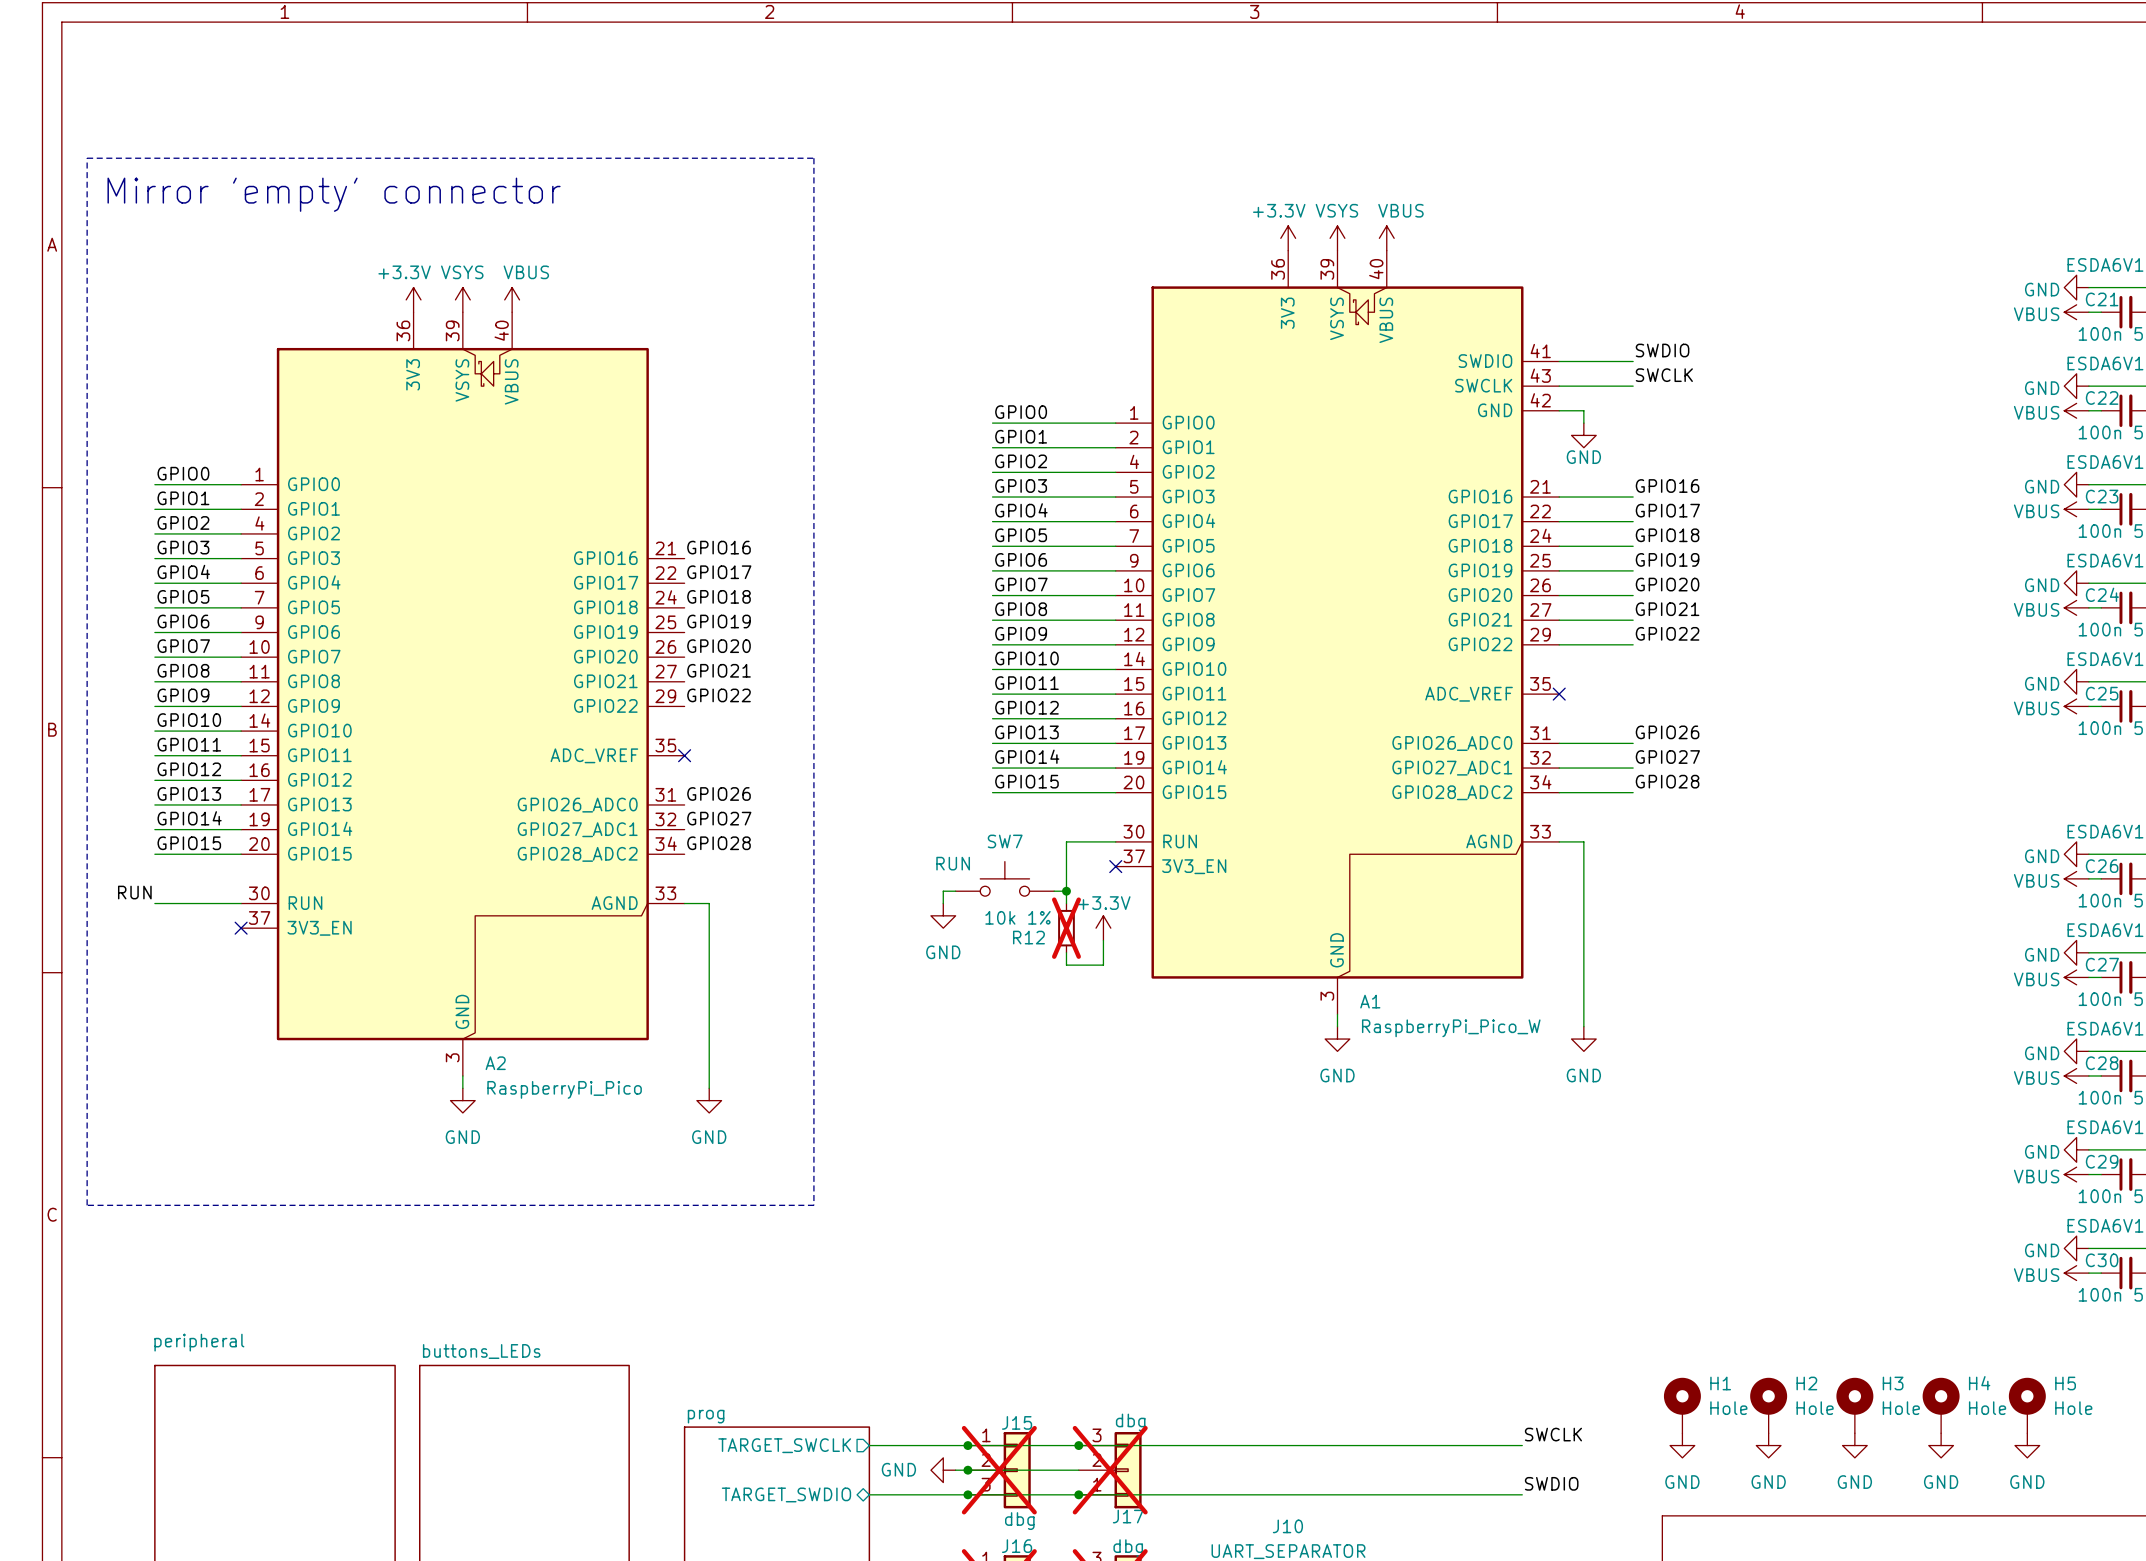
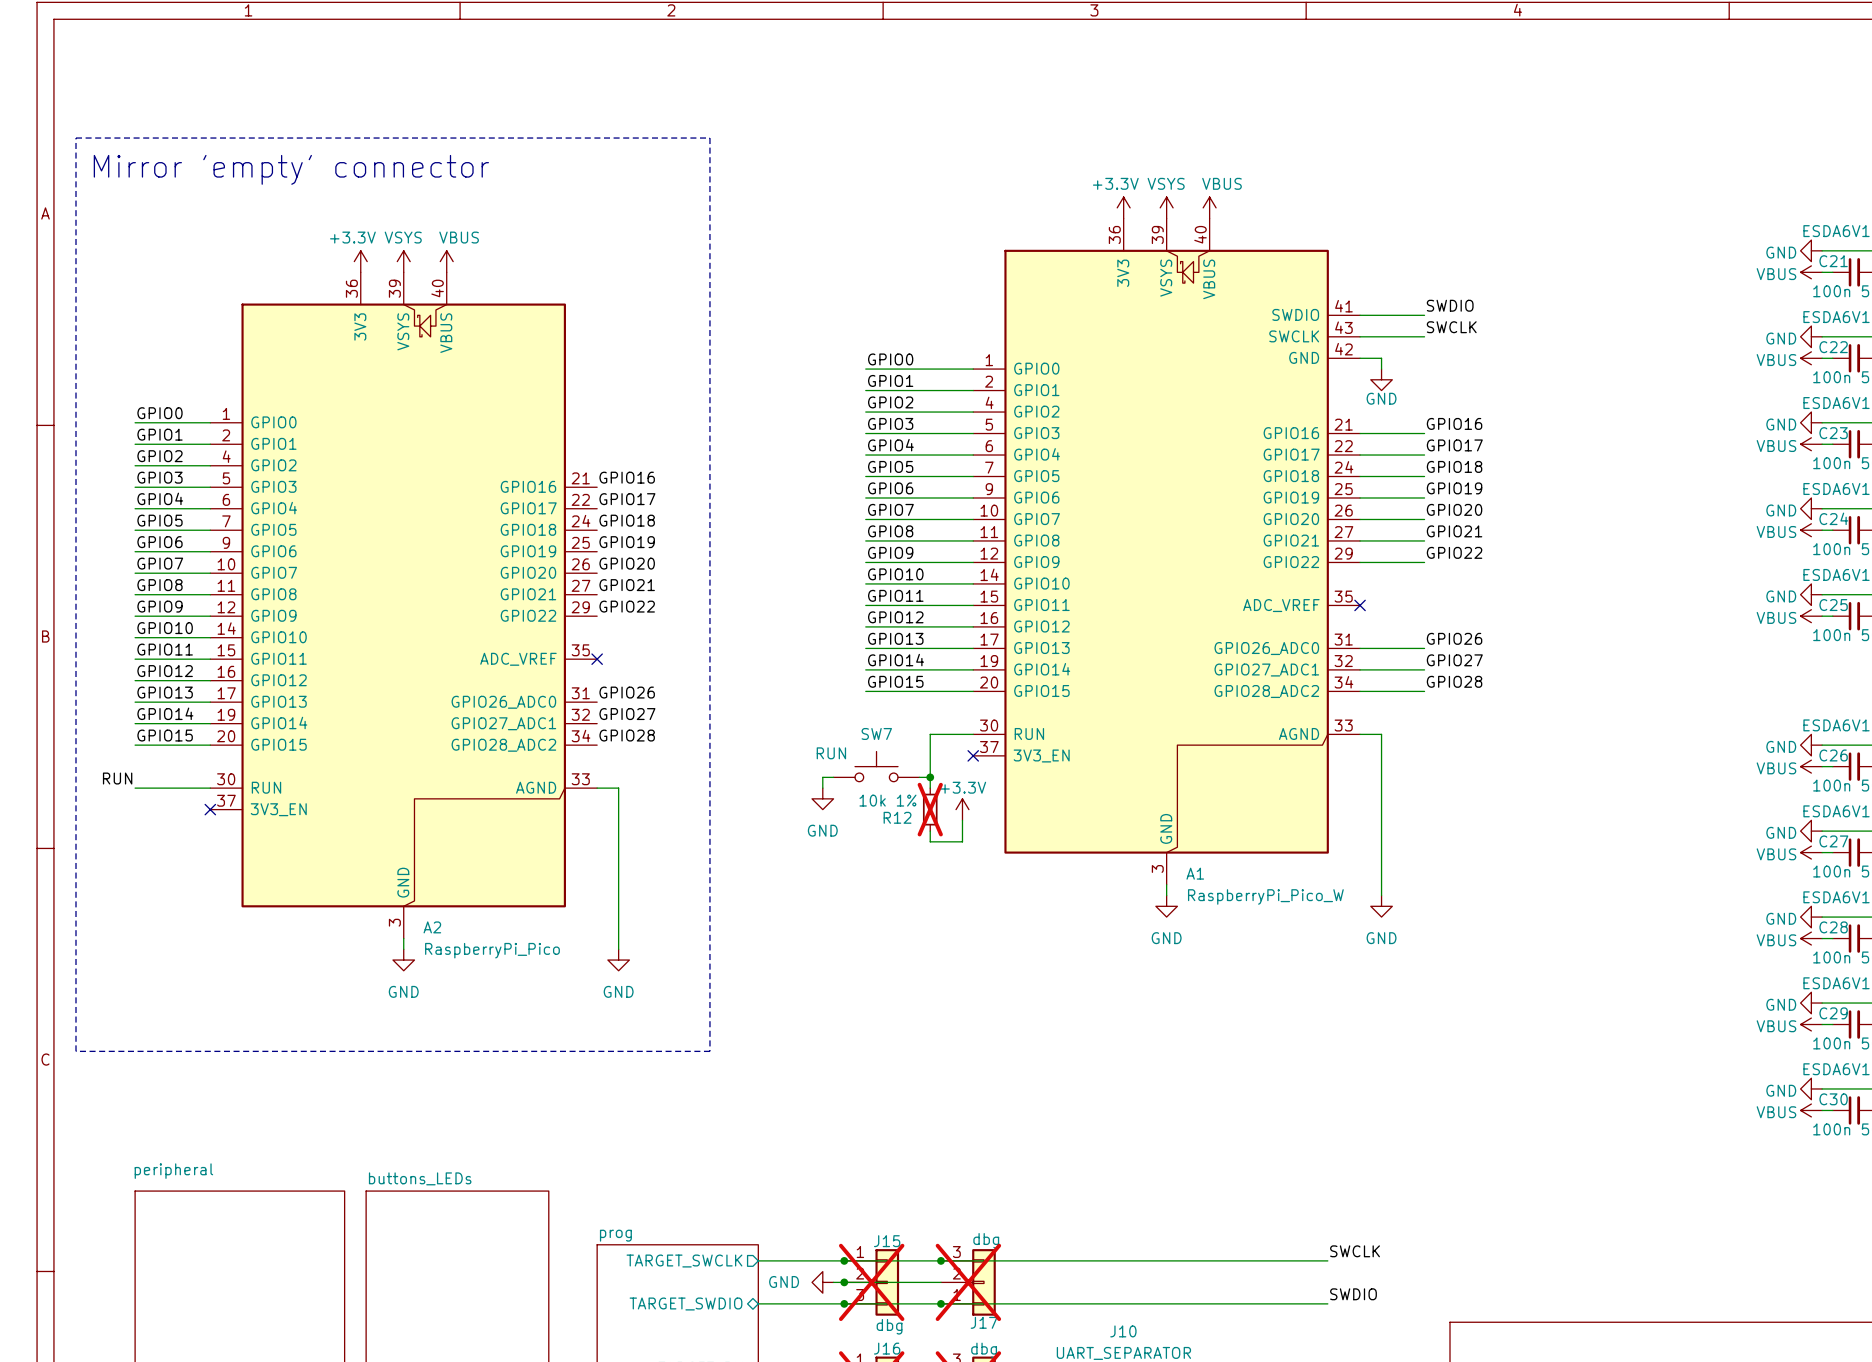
H1: Hole (1682, 1405) -> none
H2: Hole (1768, 1405) -> none
H3: Hole (1854, 1405) -> none
H4: Hole (1941, 1405) -> none
H5: Hole (2027, 1405) -> none
power symbol: GND (1682, 1445) -> none
power symbol: GND (1768, 1445) -> none
power symbol: GND (1854, 1445) -> none
power symbol: GND (1941, 1445) -> none
power symbol: GND (2027, 1445) -> none

